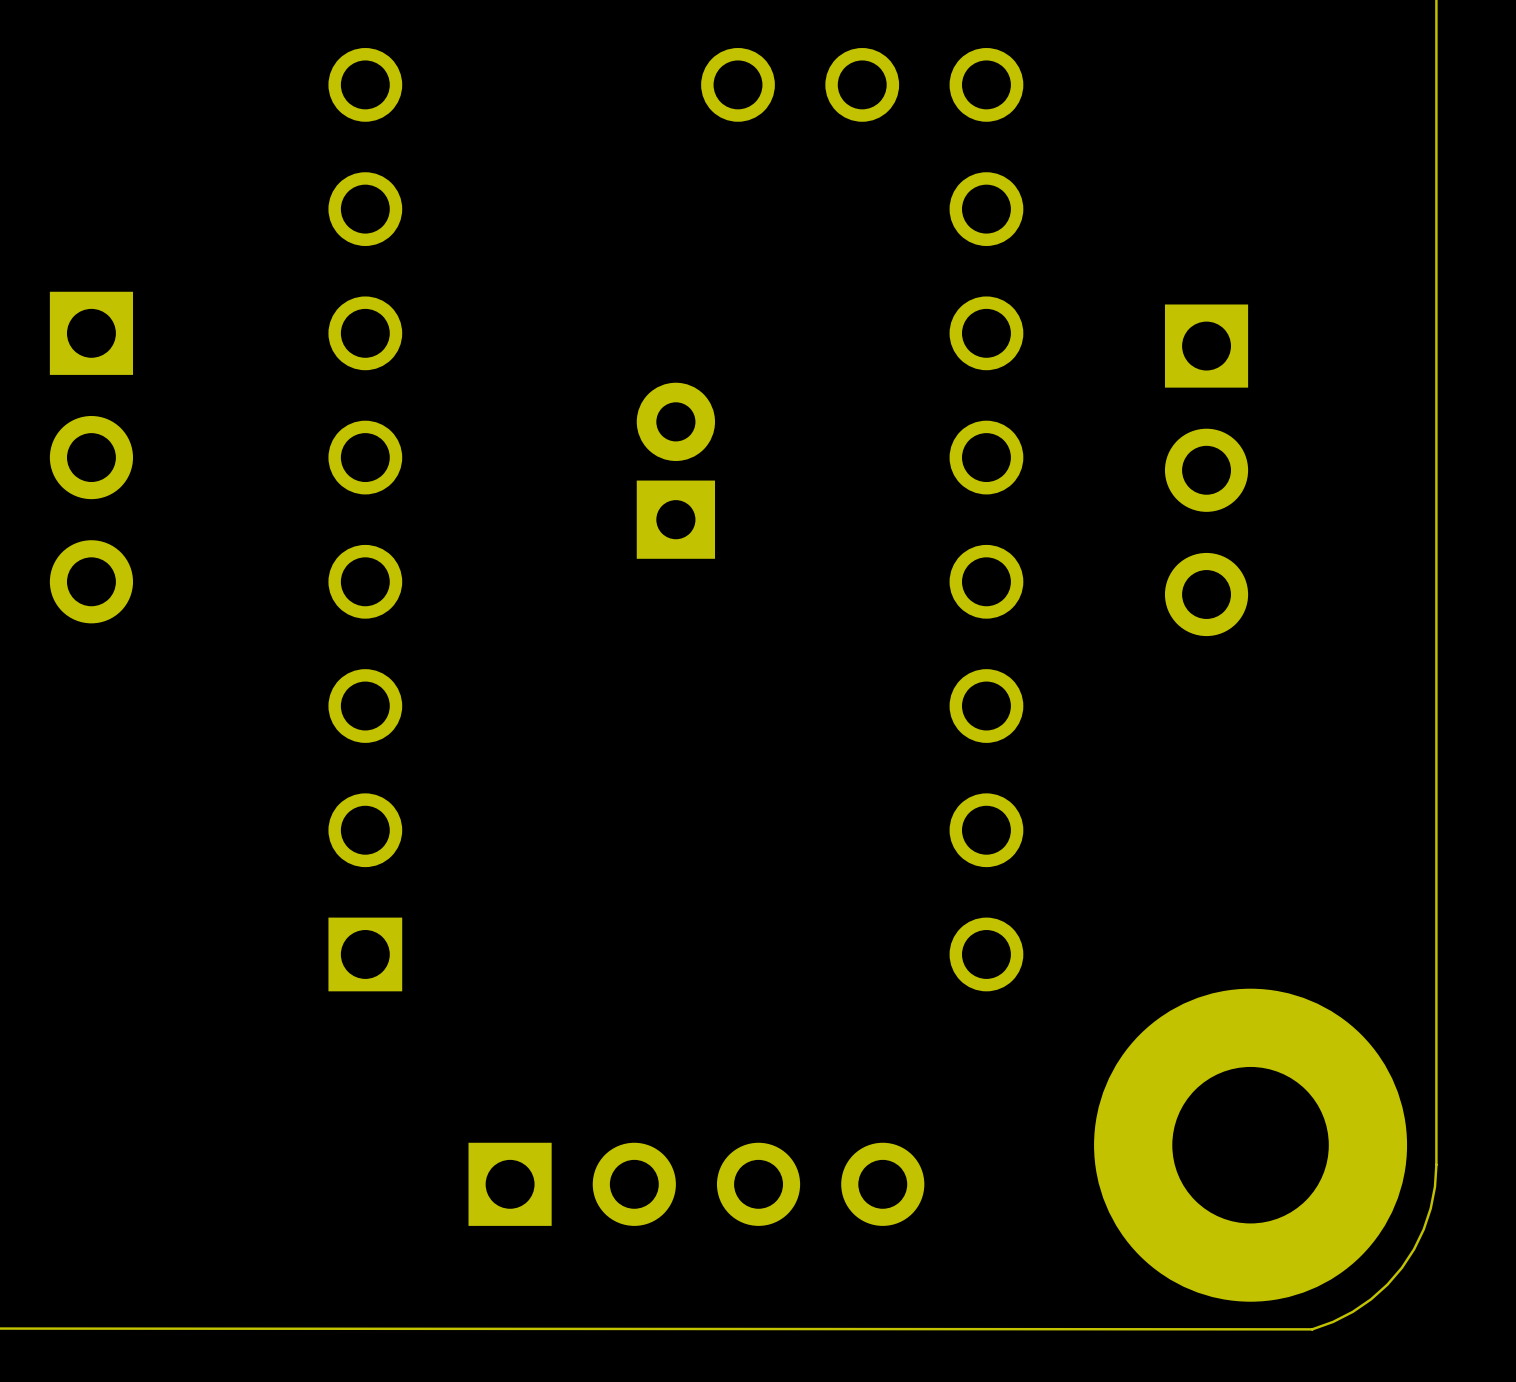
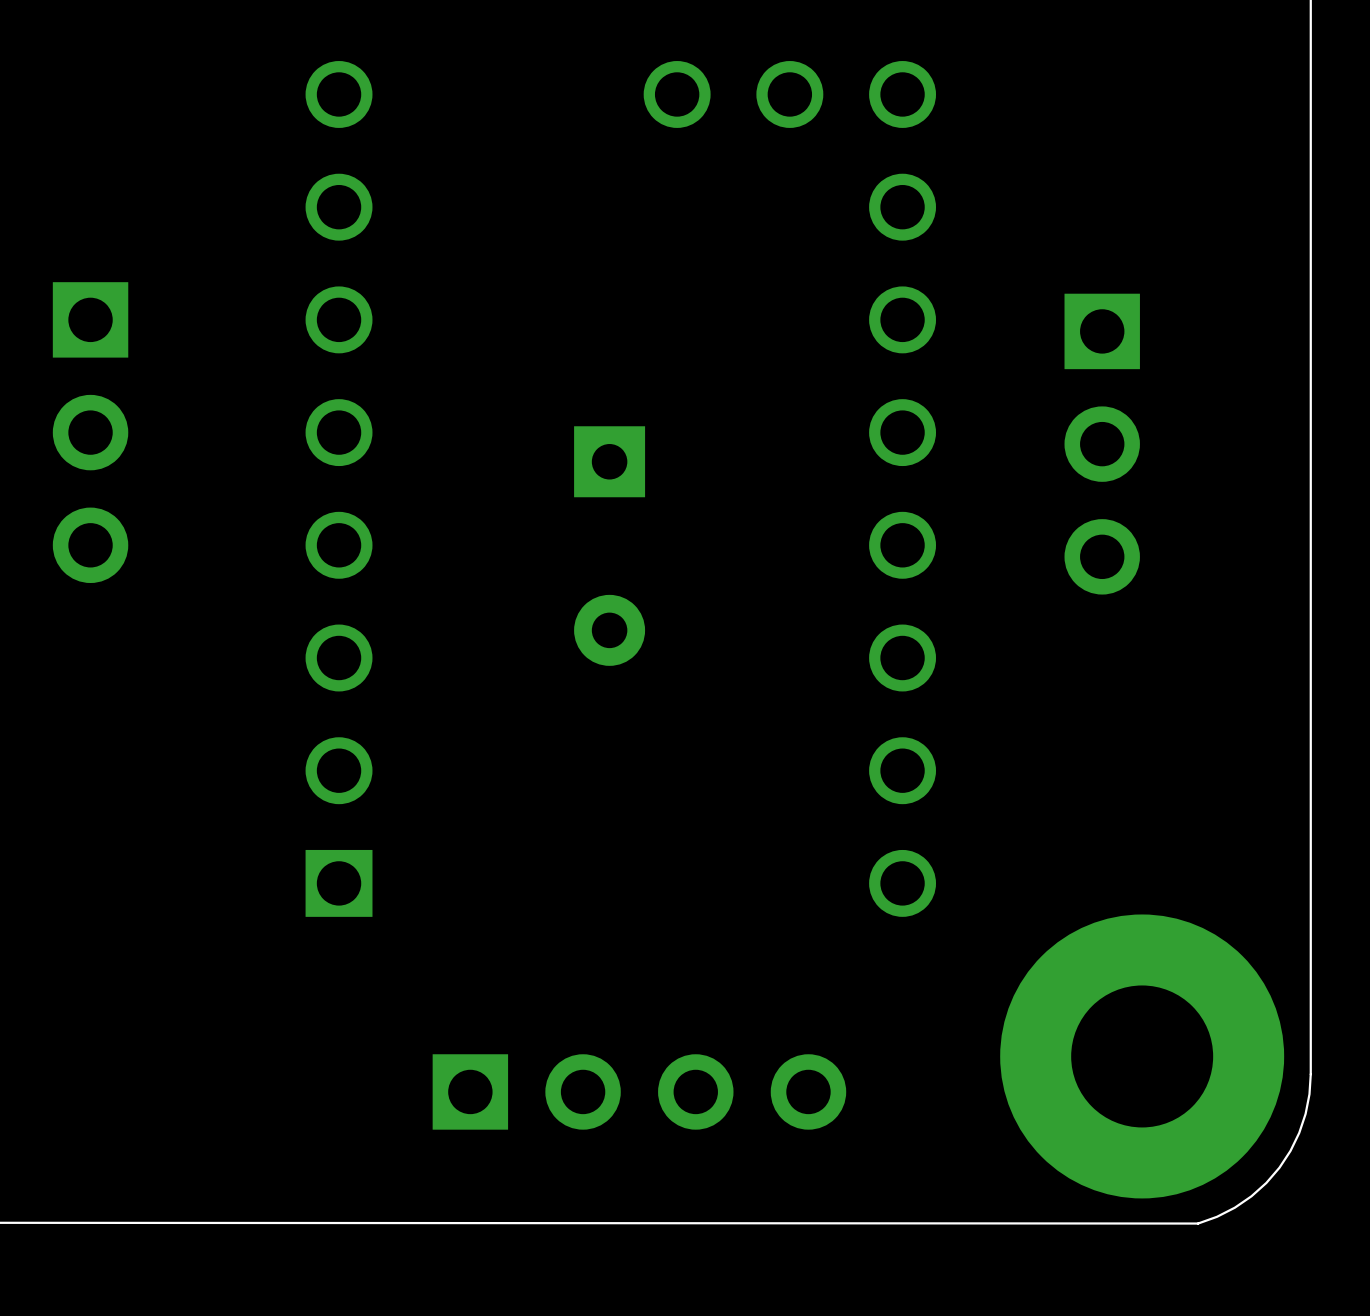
part: (675, 470) -> none
part: none -> (609, 546)

